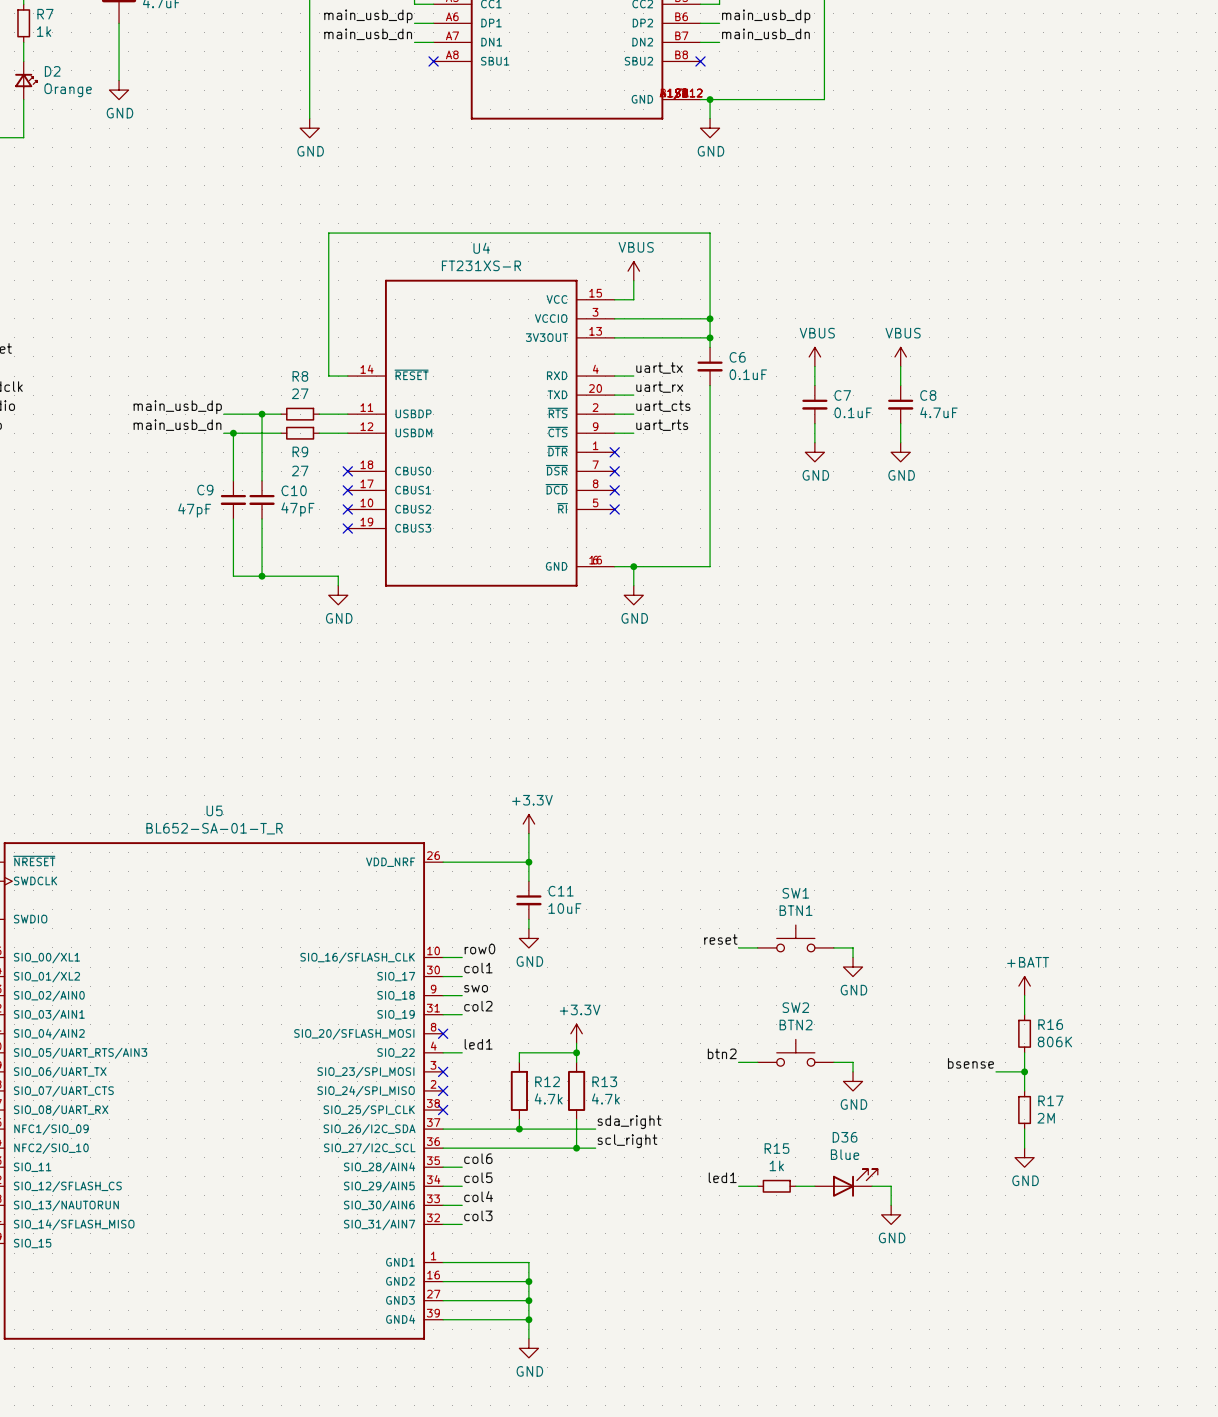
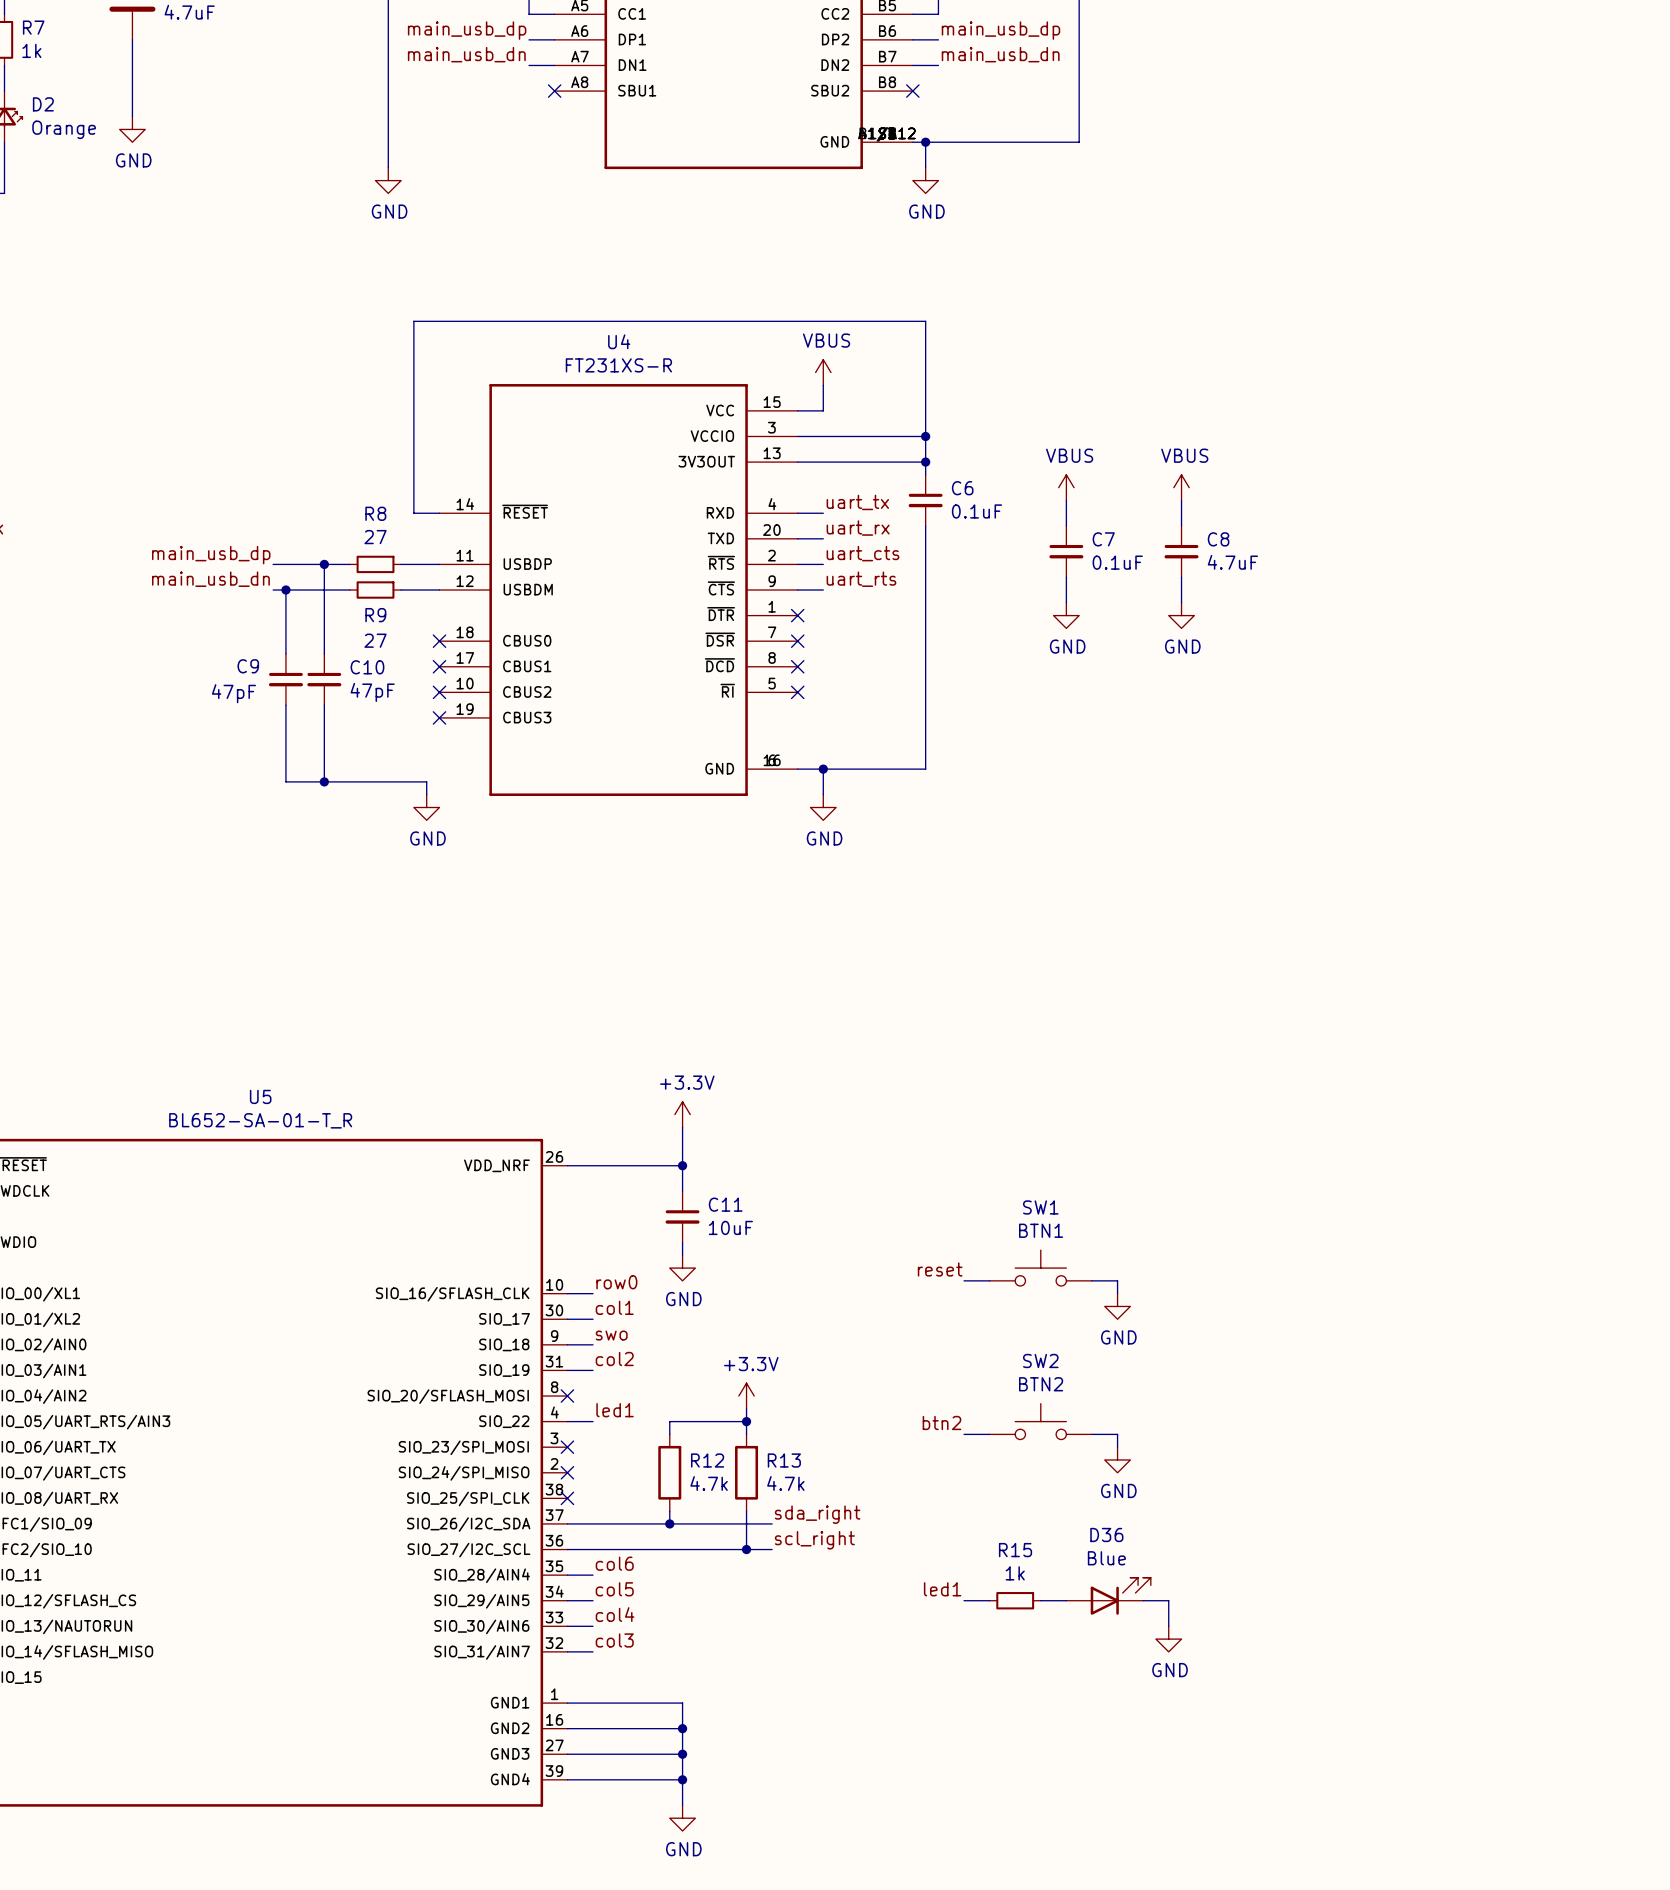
power symbol: +BATT (1024, 986) -> none
wire: (1024, 995) (1024, 1014) -> none
R16: 806K (1024, 1033) -> none
wire: (1024, 1052) (1024, 1090) -> none
label: bsense (970, 1063) -> none
wire: (996, 1071) (1024, 1071) -> none
junction: (1024, 1071) -> none
R17: 2M (1024, 1110) -> none
wire: (1024, 1129) (1024, 1148) -> none
power symbol: GND (1024, 1157) -> none

